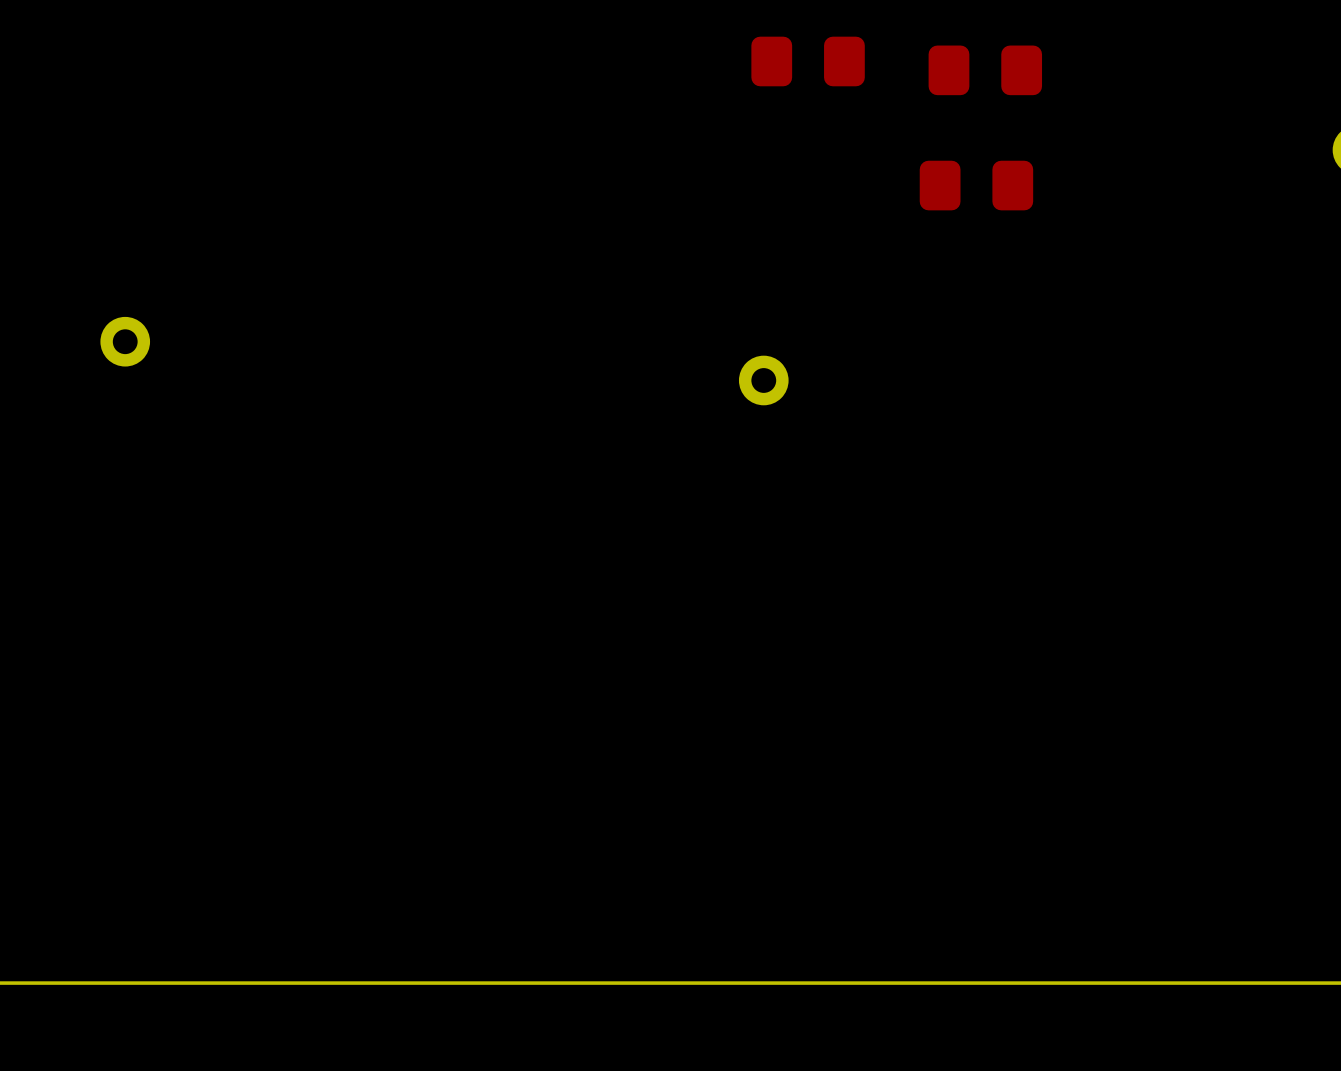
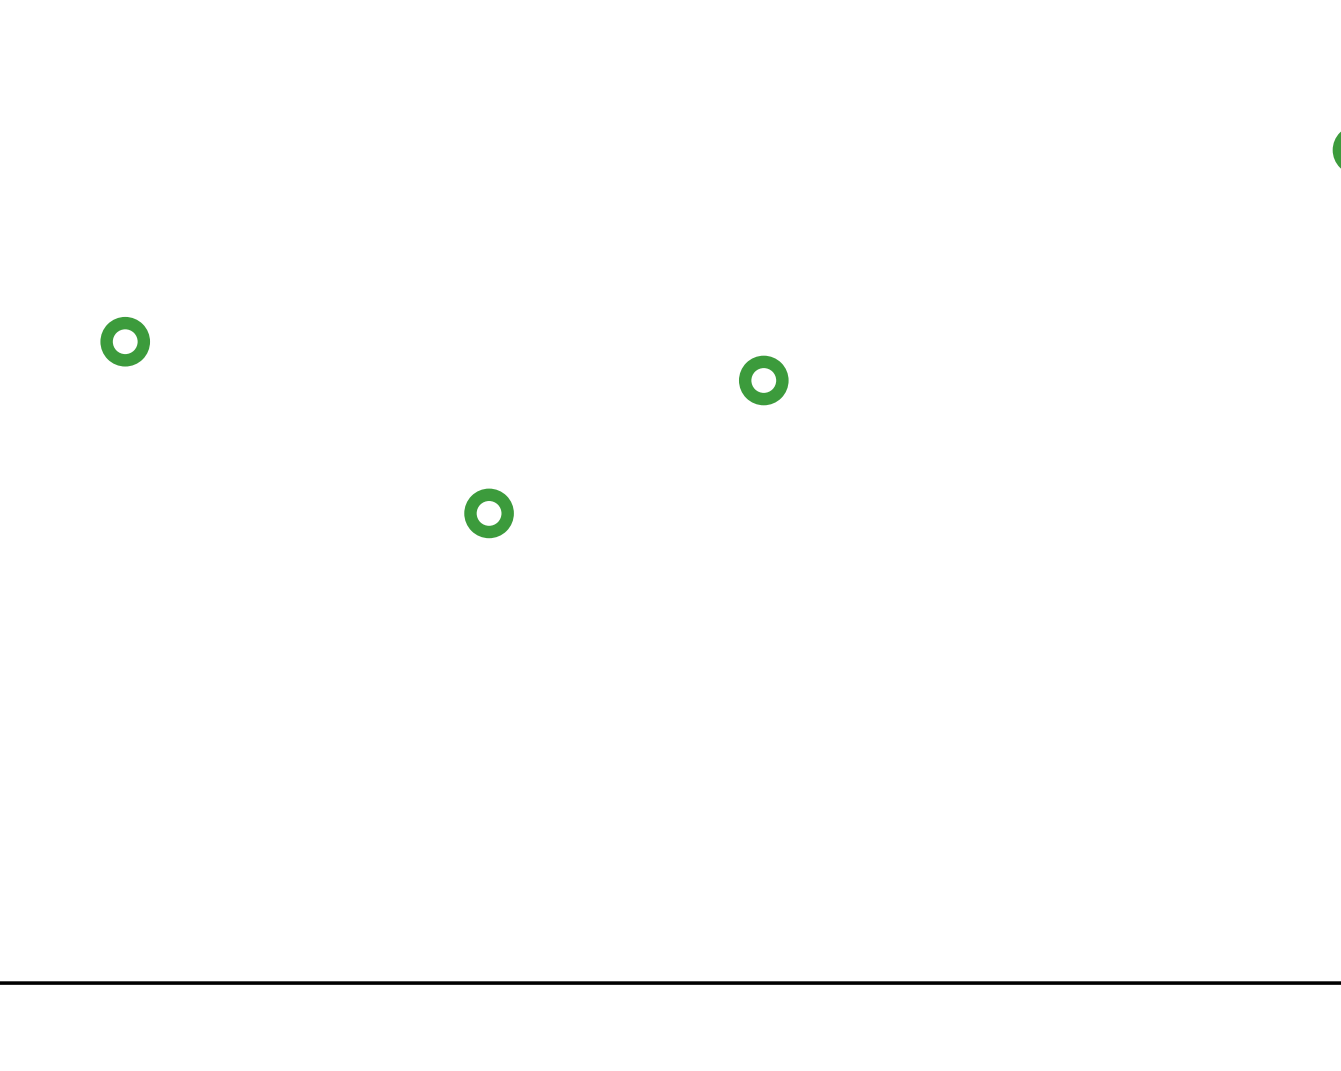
part: (808, 61) -> none
part: (985, 70) -> none
part: (976, 185) -> none
part: none -> (489, 513)

